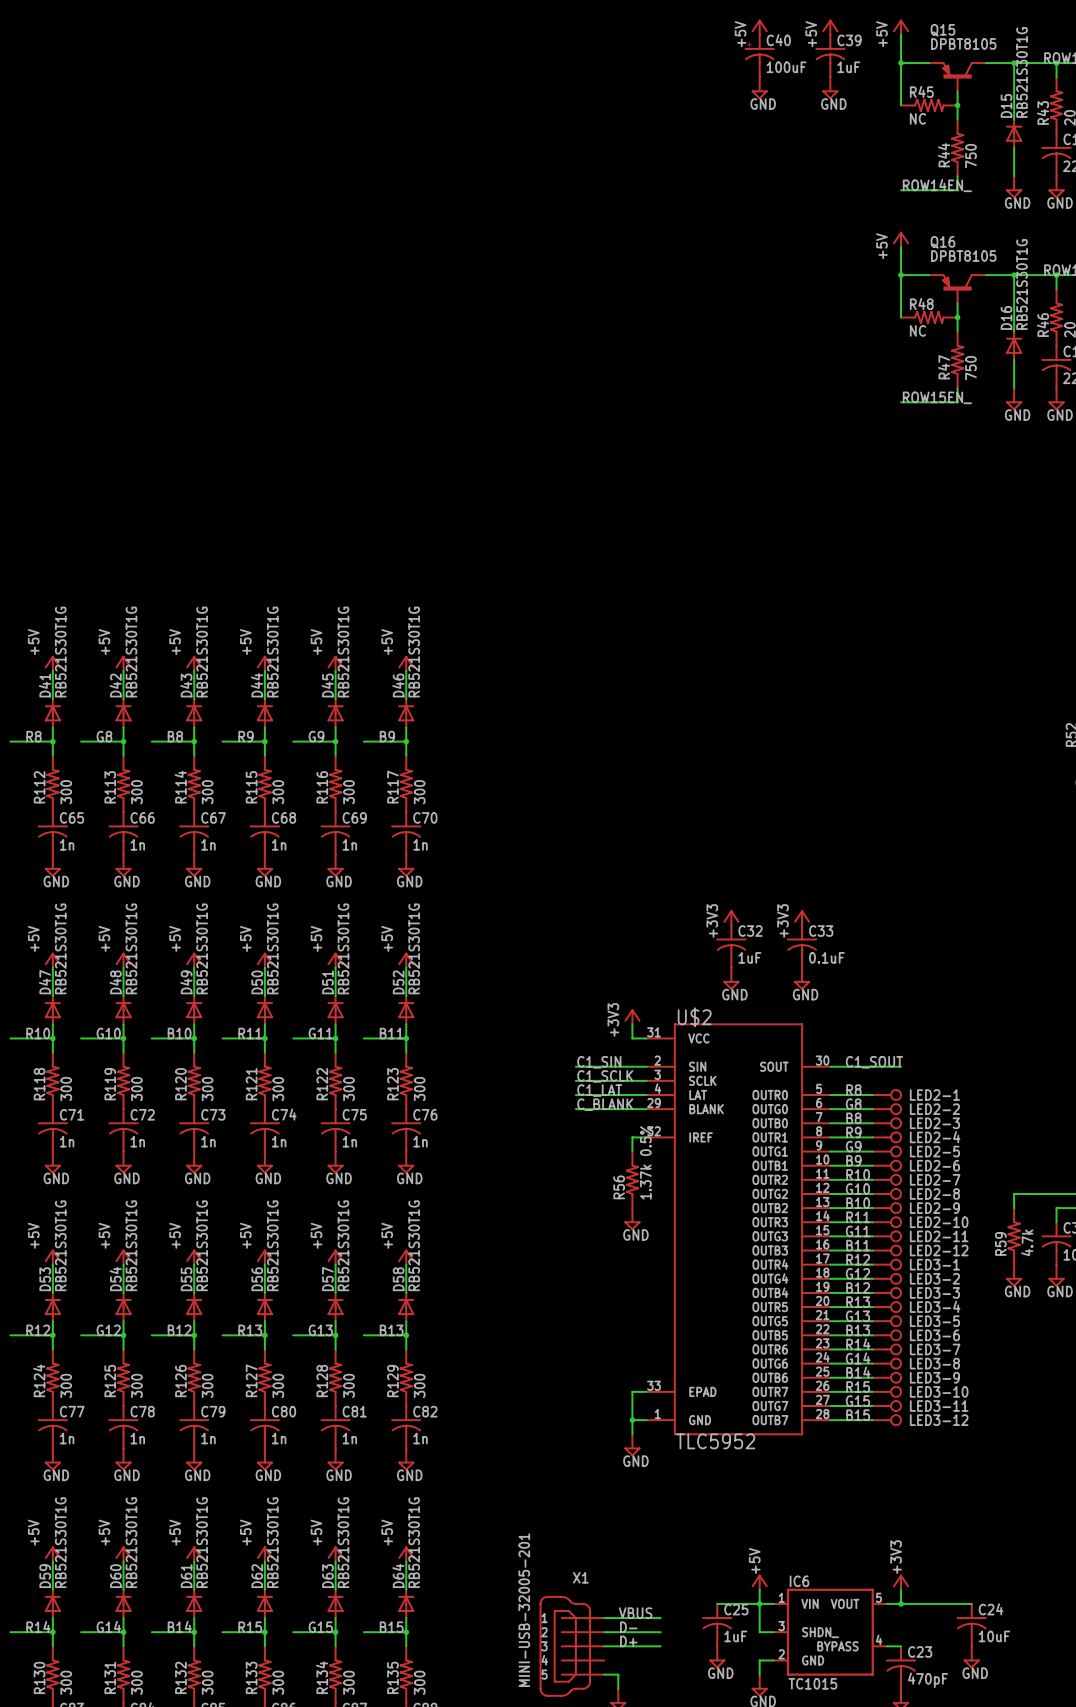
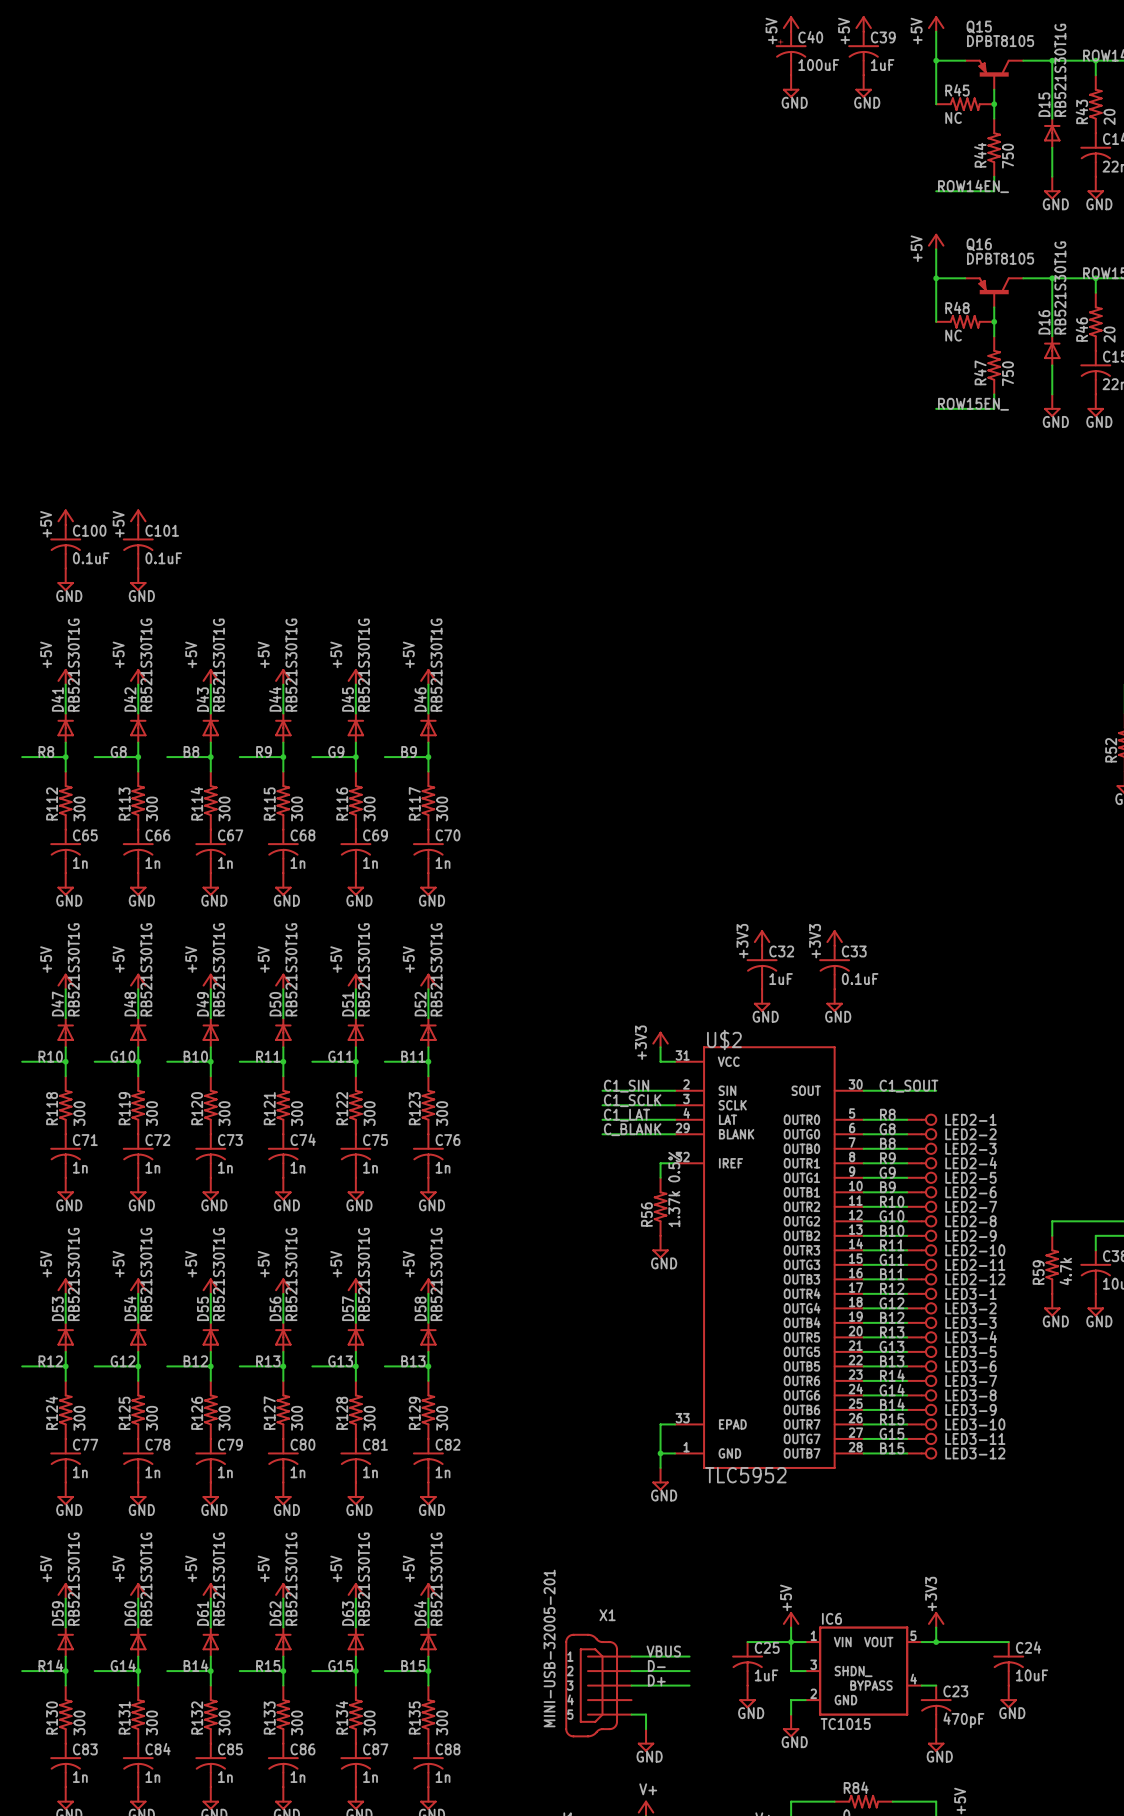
power symbol: none -> +5V (65, 517)
power symbol: none -> +5V (138, 517)
C100: none -> 0.1uF (65, 546)
C101: none -> 0.1uF (138, 546)
power symbol: none -> GND (65, 579)
power symbol: none -> GND (138, 579)

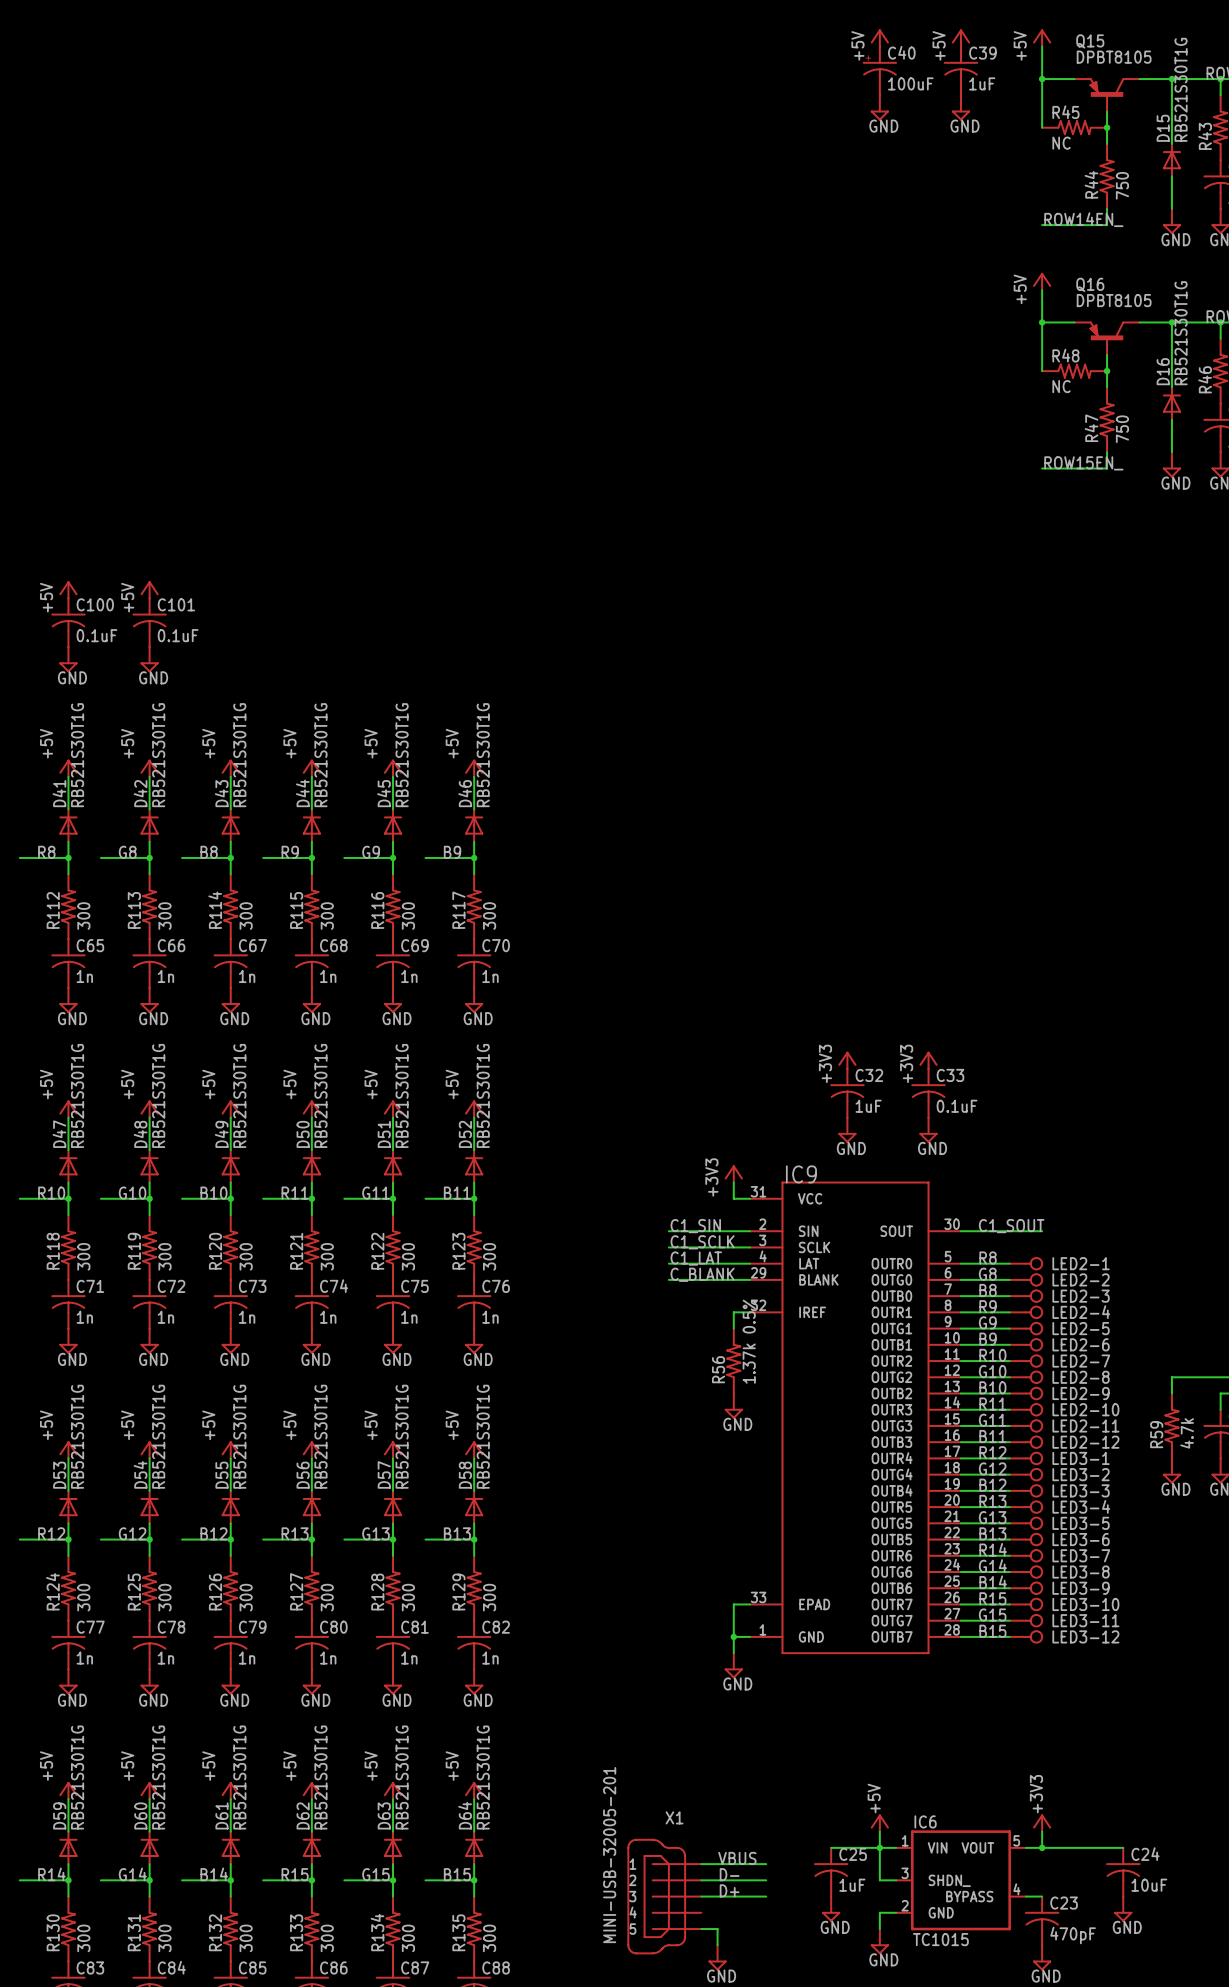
U$2 name: U$2 (724, 1039) -> IC9 (801, 1174)
U$2 value: TLC5952 (745, 1475) -> none

